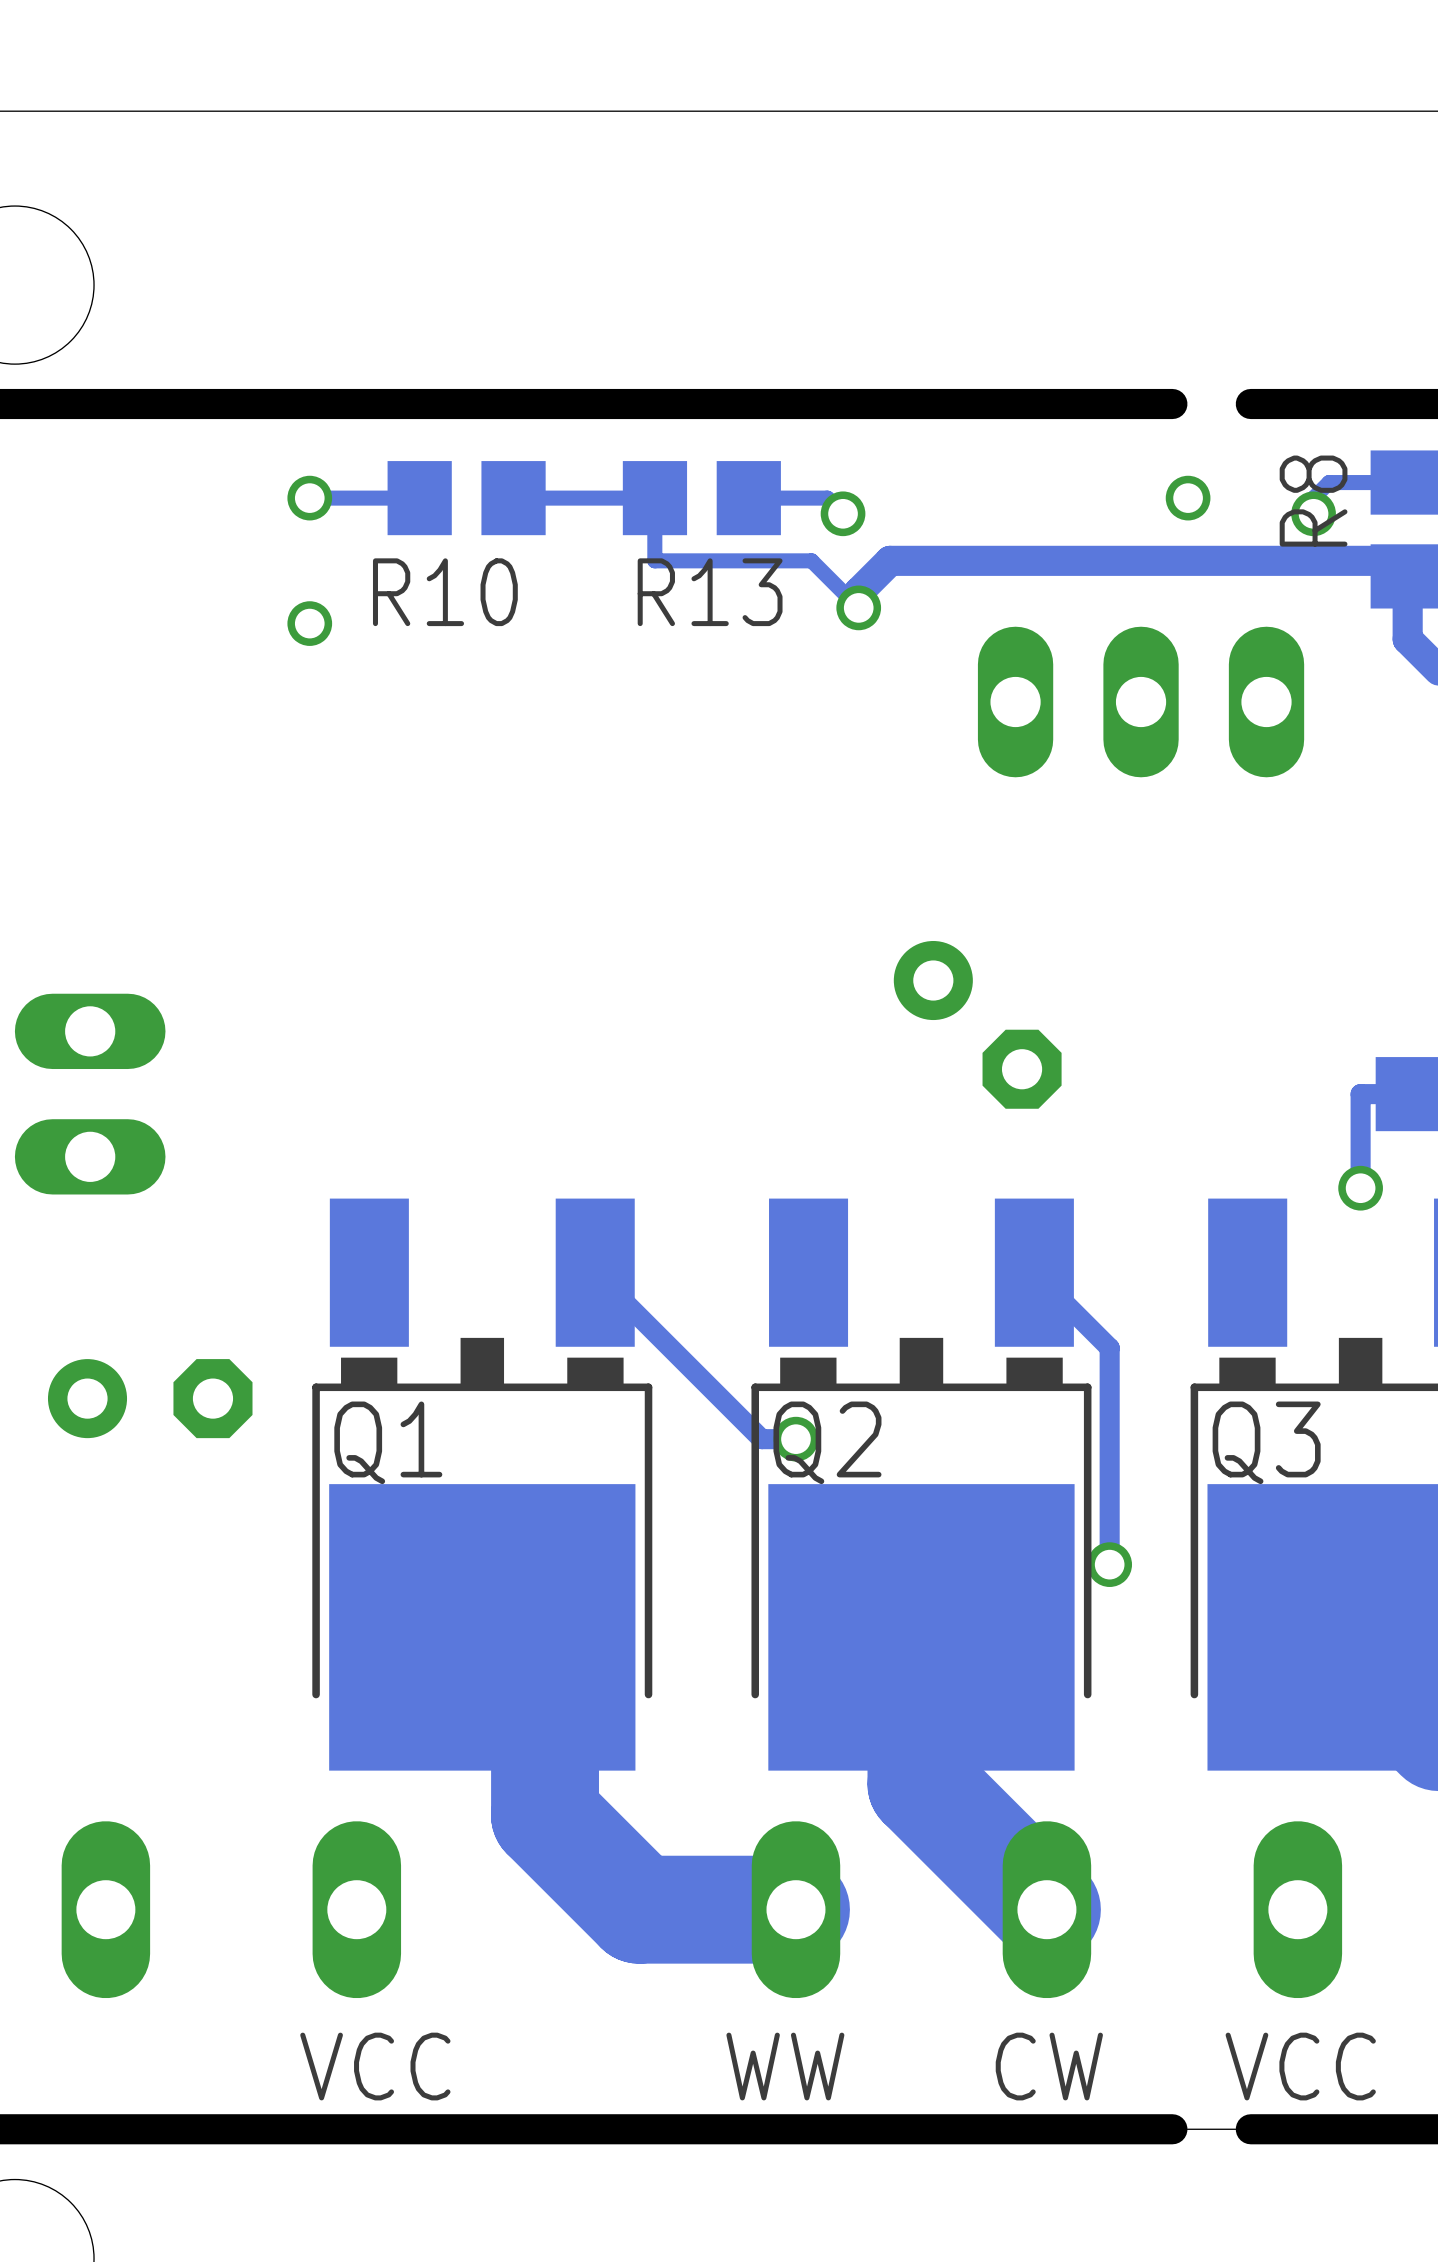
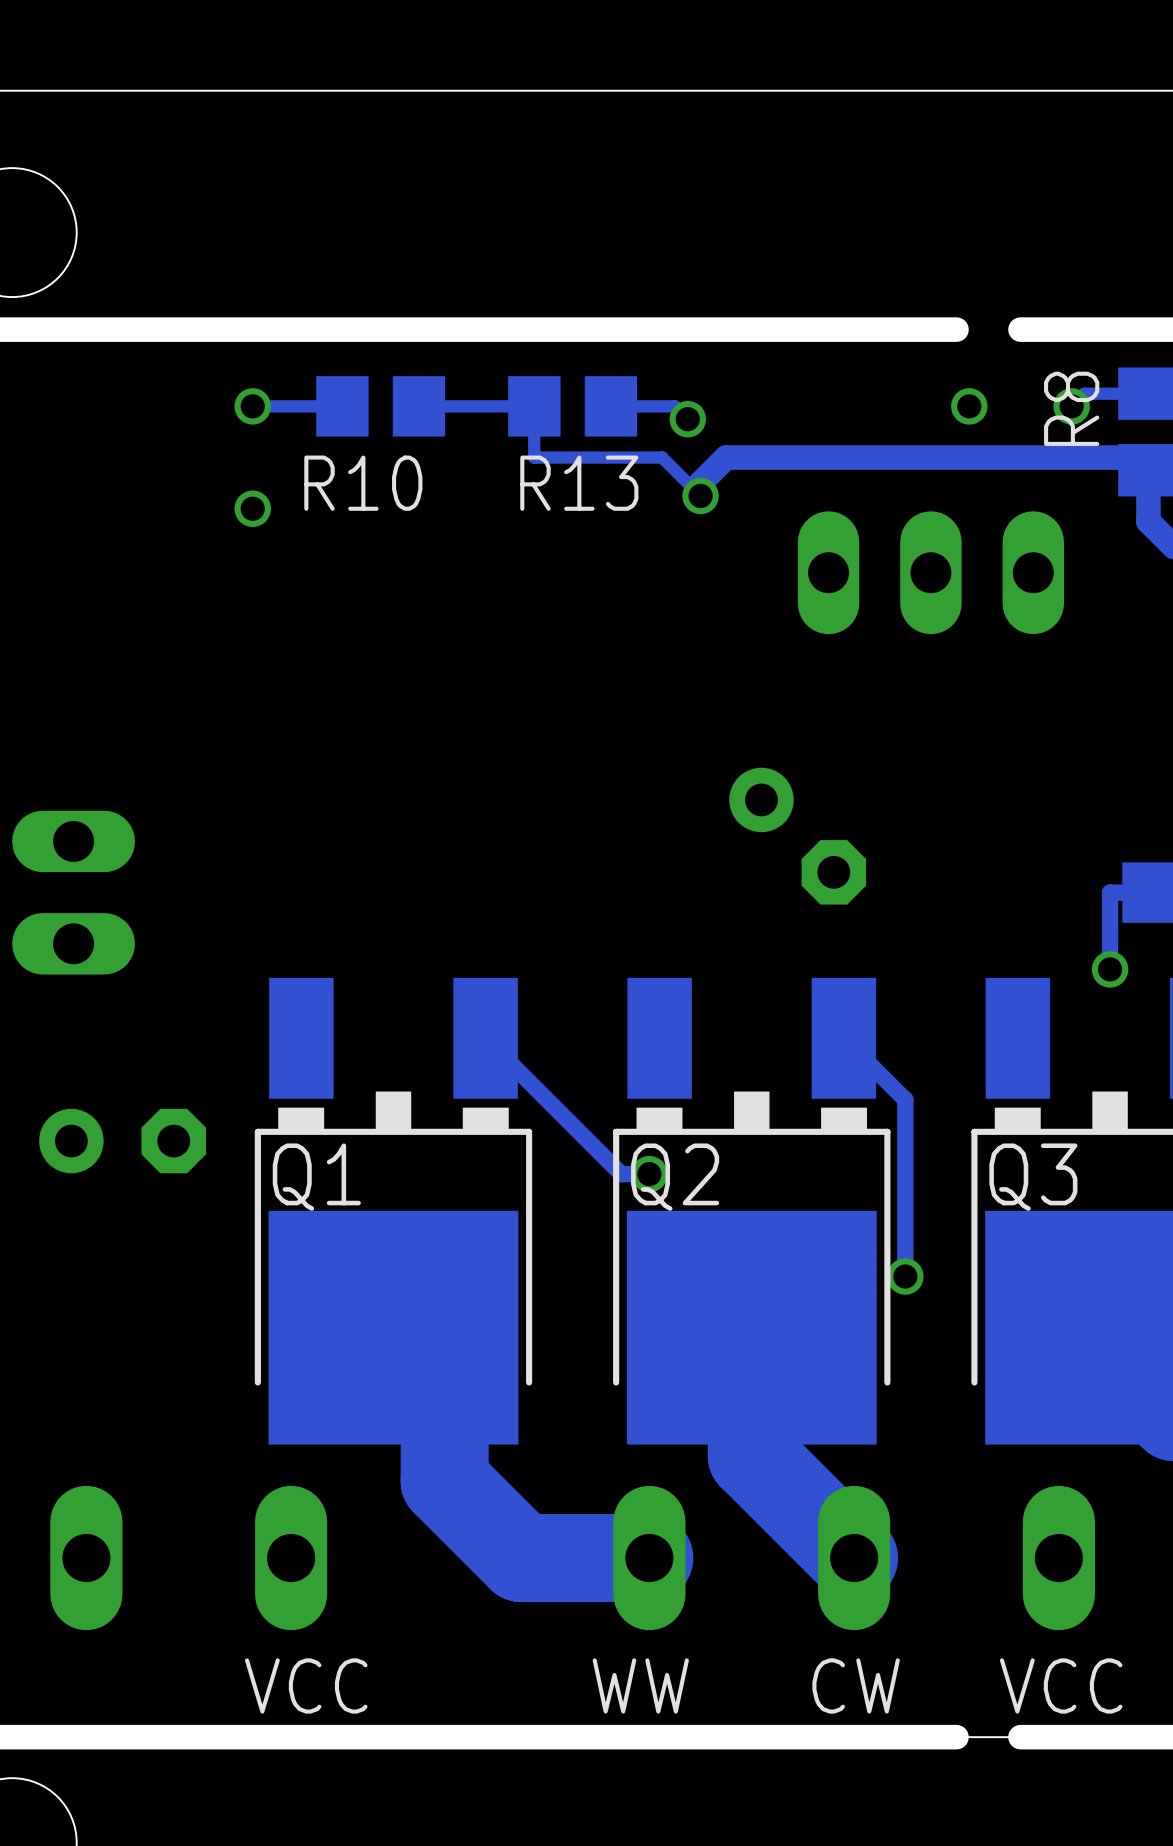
via position: (1313, 513) -> (1071, 406)

